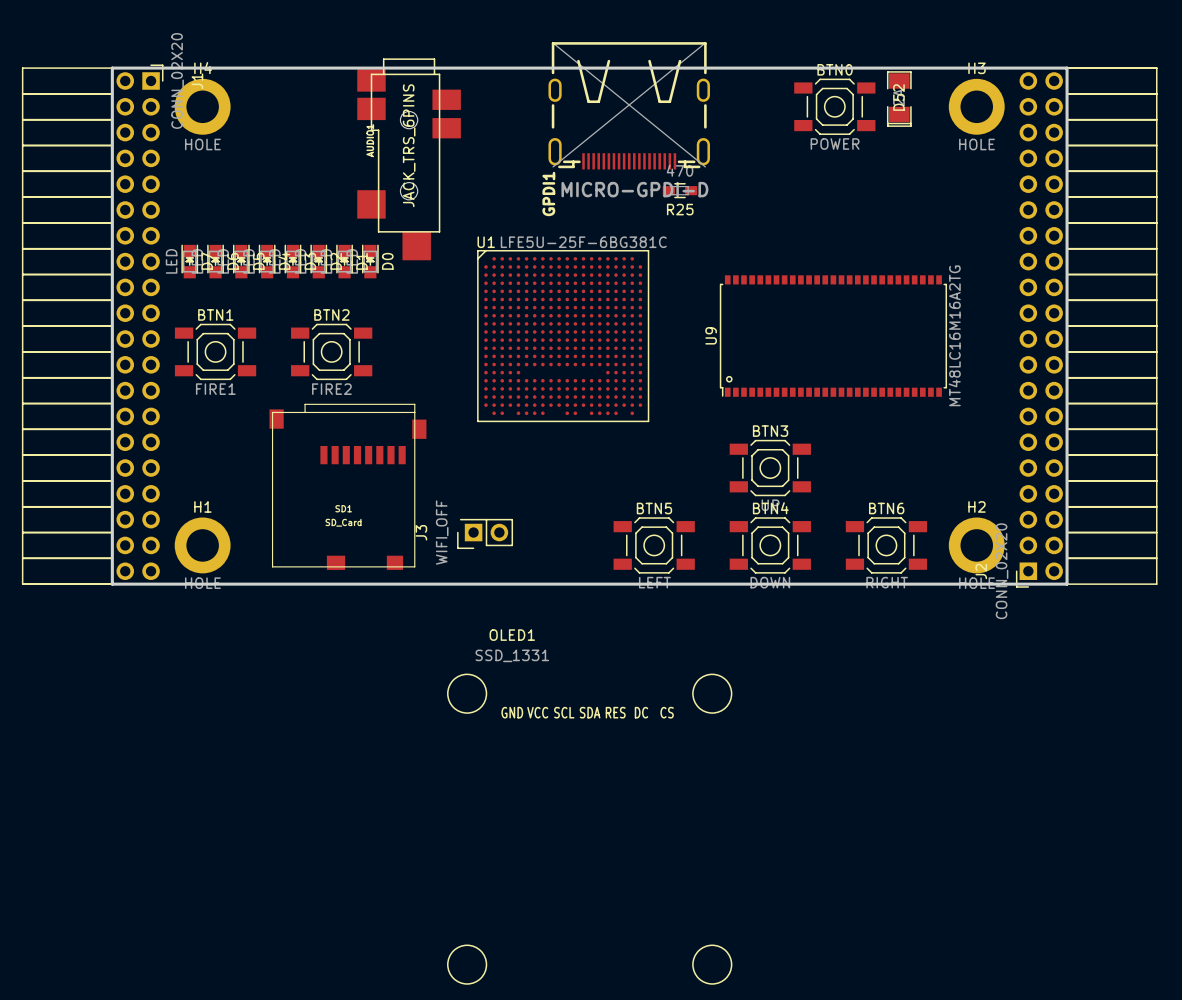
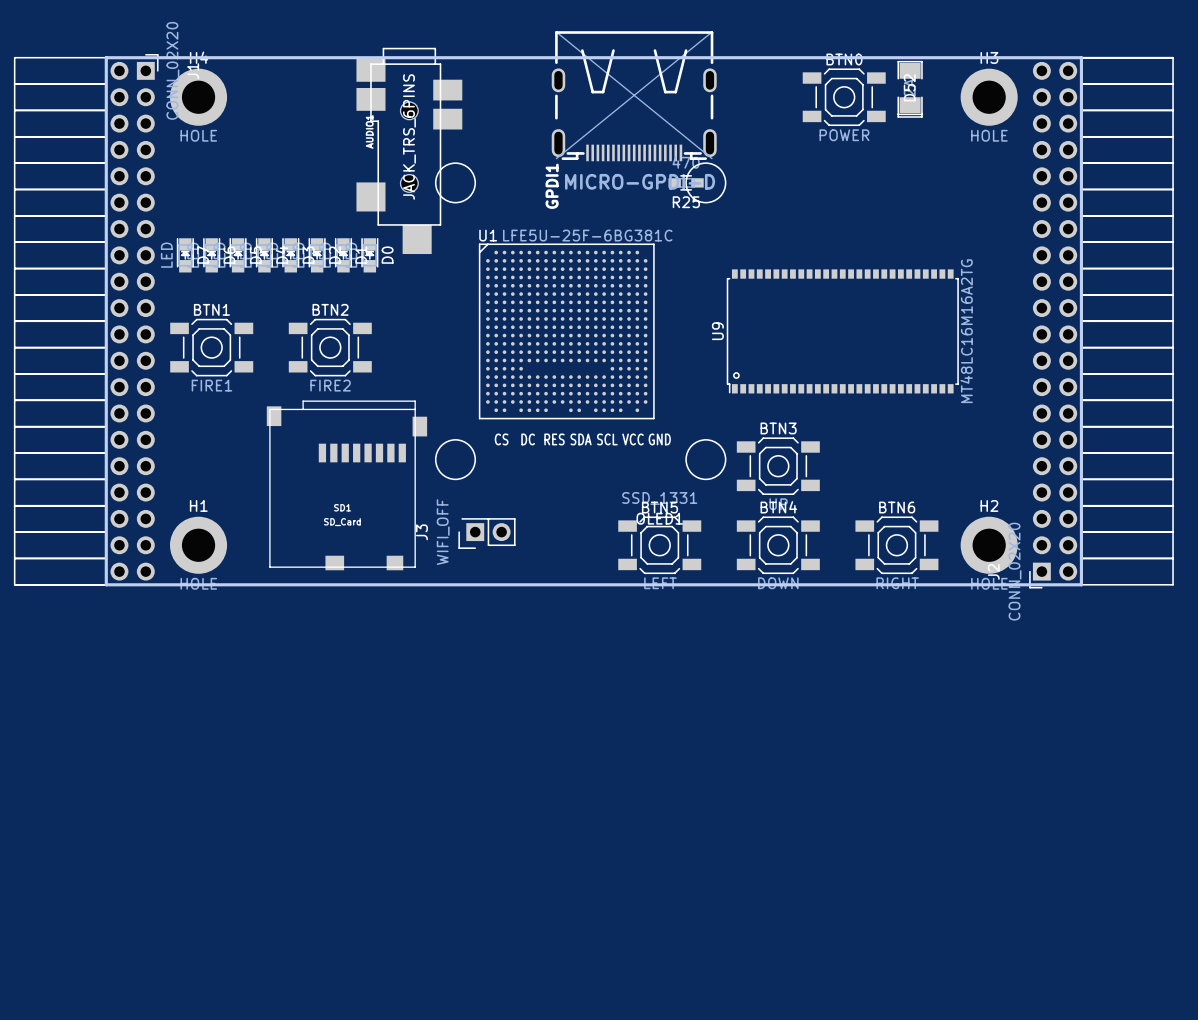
OLED1 rotation: 0° (589, 829) -> 180° (580, 321)
OLED1 position: (589, 829) -> (580, 321)

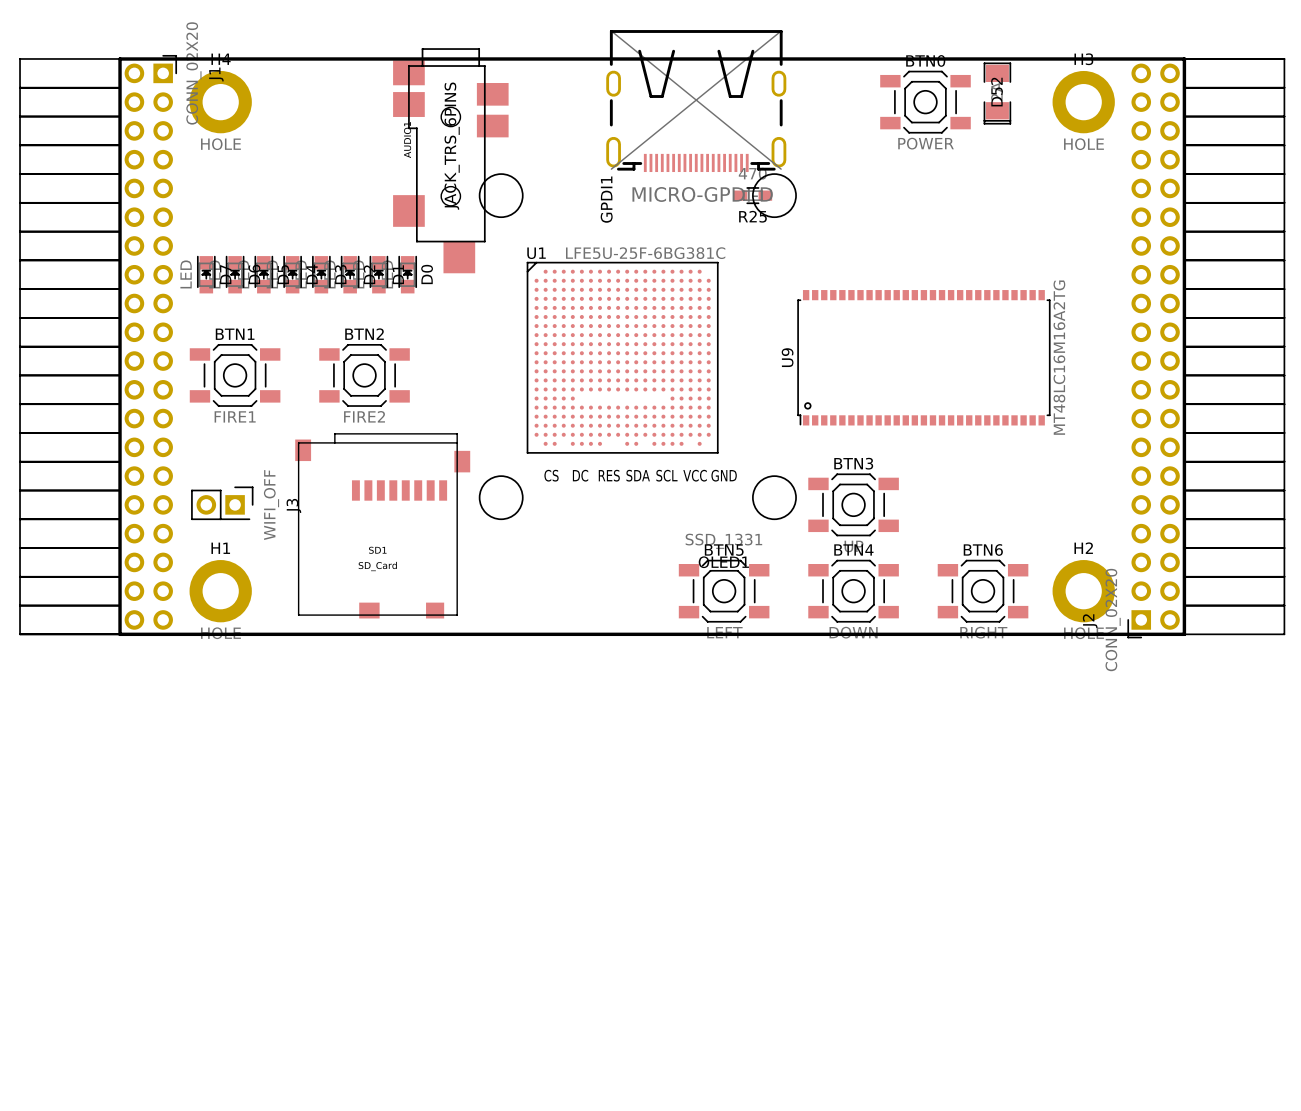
J3 rotation: 0° (486, 533) -> 180° (222, 503)
J3 position: (486, 533) -> (222, 503)

